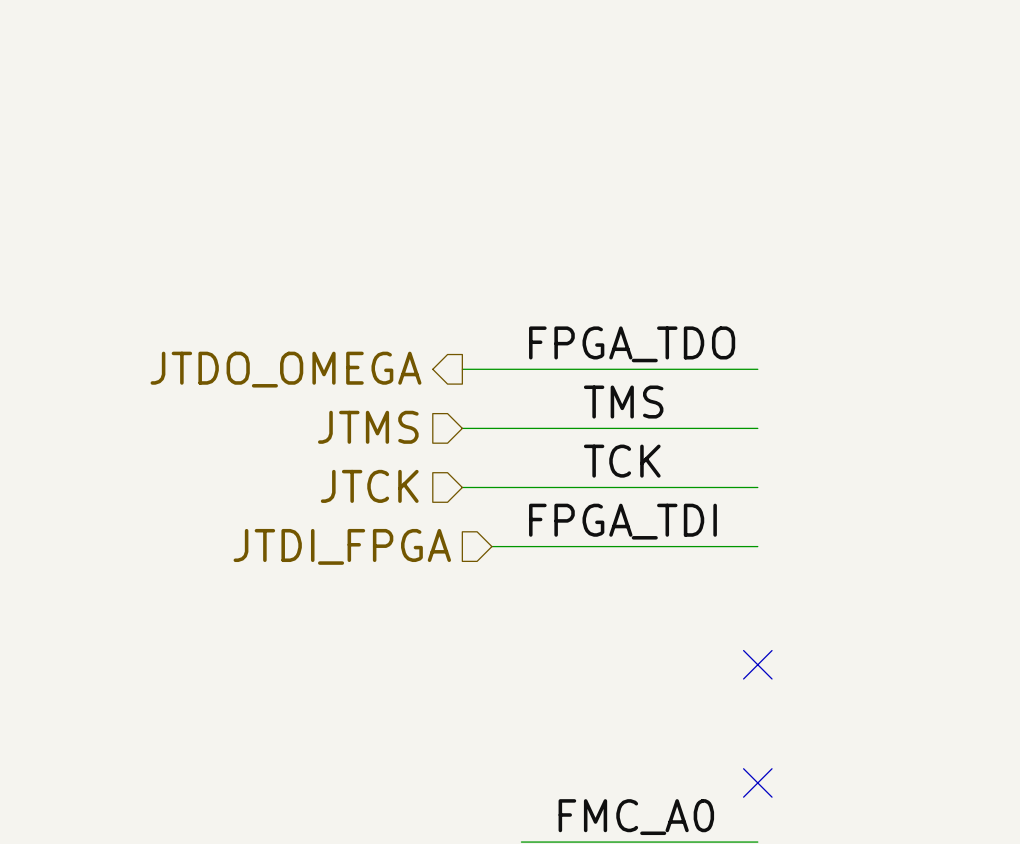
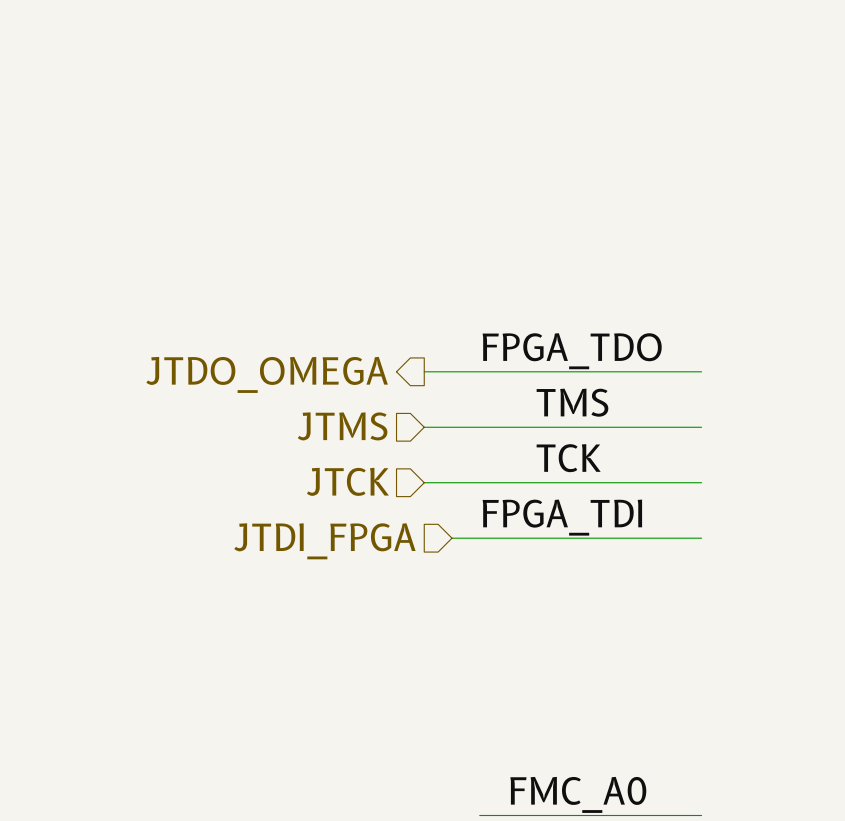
no-connect mark: (757, 664) -> none
no-connect mark: (757, 782) -> none

